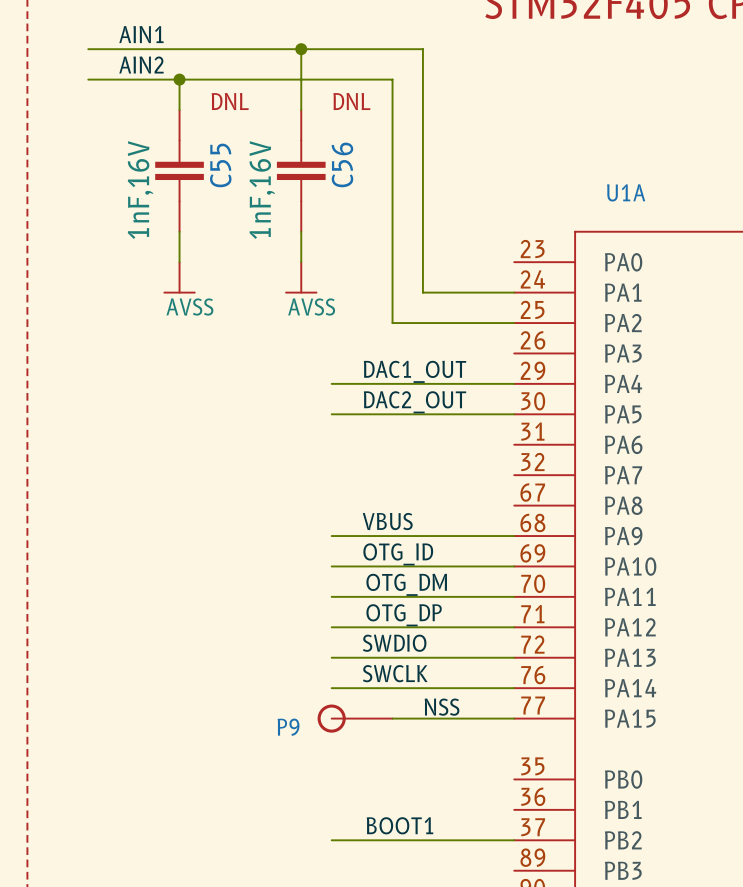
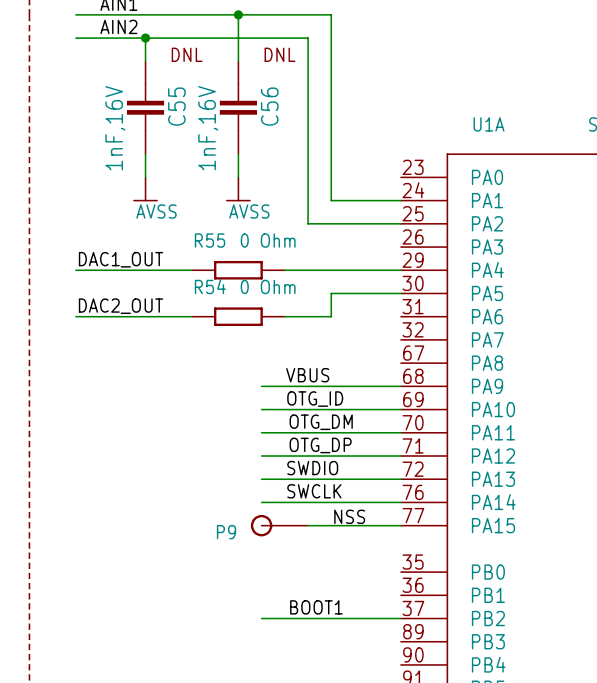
label position: DAC1_OUT (415, 371) -> DAC1_OUT (121, 259)
wire: none -> (75, 270) (191, 270)
R55: none -> 0 Ohm (238, 270)
label position: DAC2_OUT (415, 402) -> DAC2_OUT (121, 306)
wire: (331, 414) (422, 414) -> (284, 316) (331, 316) (331, 293)
wire: none -> (75, 316) (191, 316)
R54: none -> 0 Ohm (238, 316)

